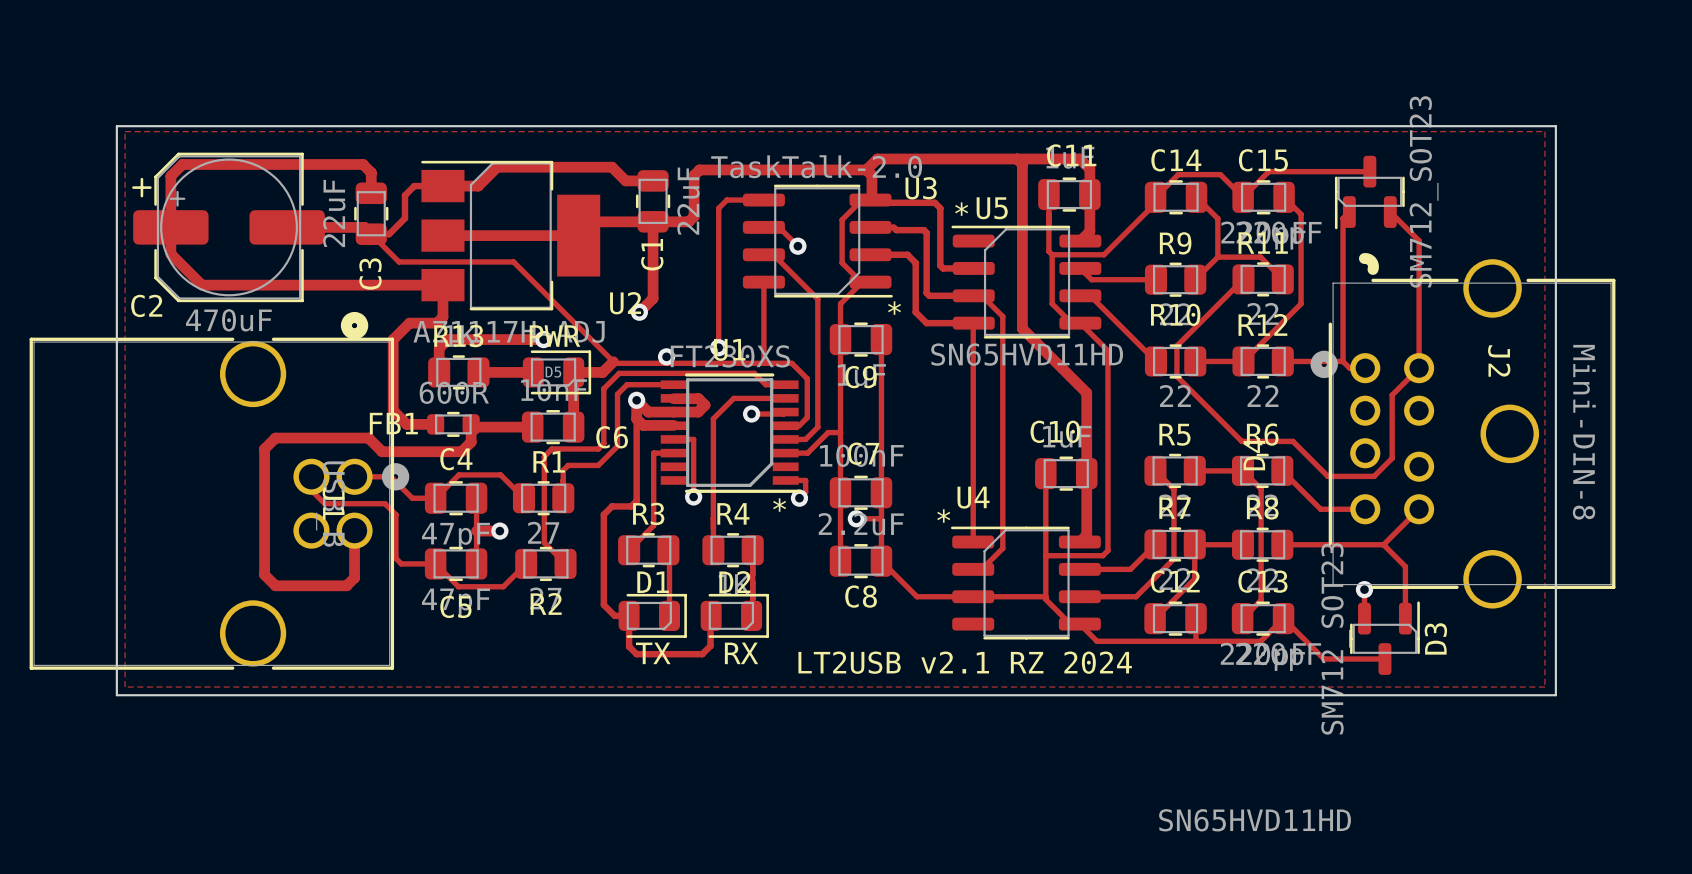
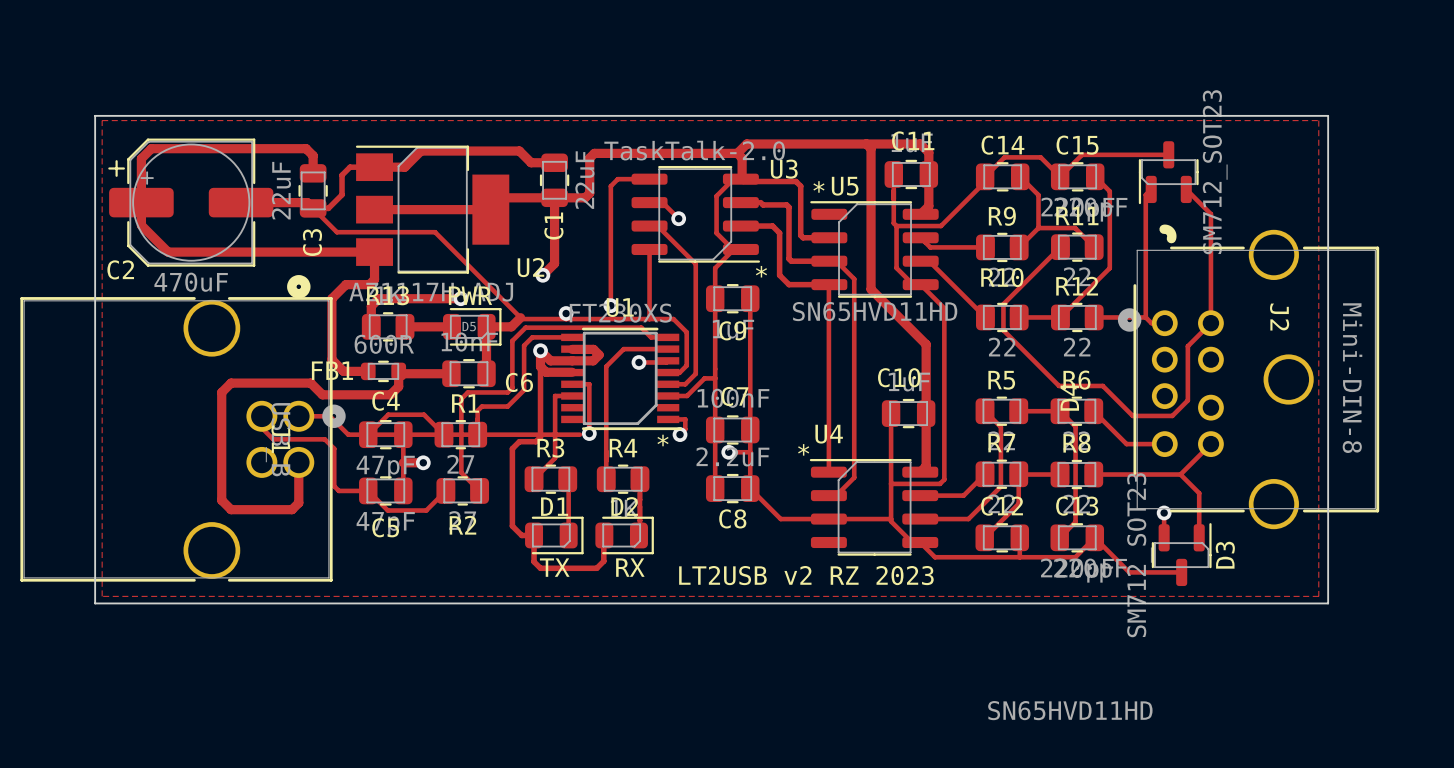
track: none -> (368, 434) (579, 434)
text: LT2USB v2.1 RZ 2024 (965, 662) -> LT2USB v2 RZ 2023 (806, 575)

